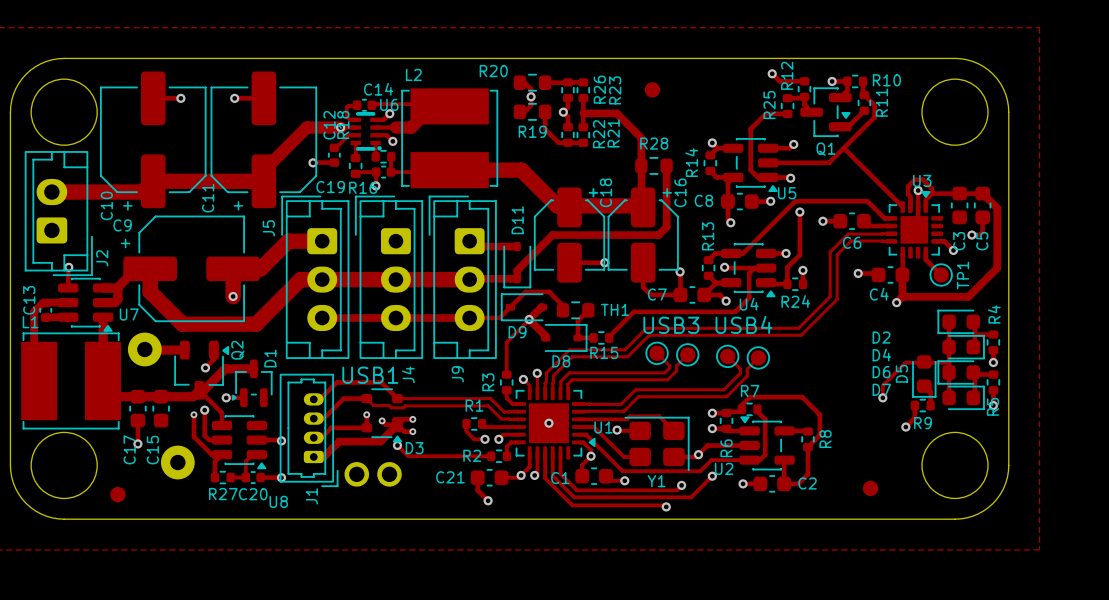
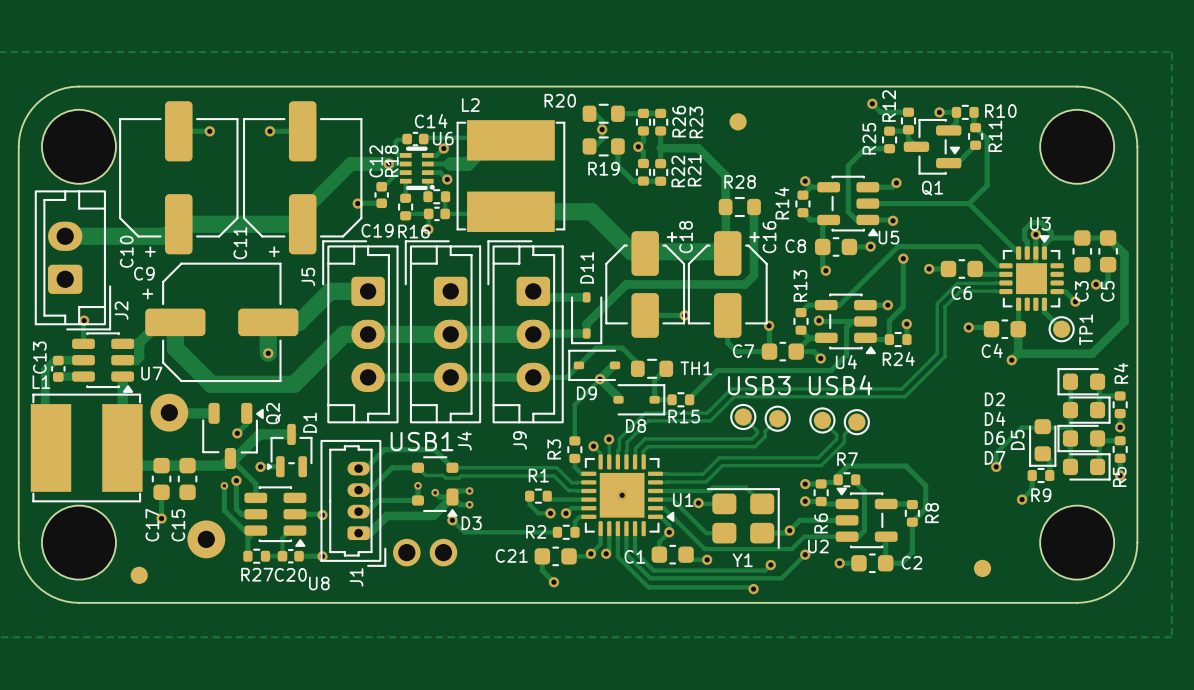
track: (874, 117) (829, 162) -> (987, 152) (987, 185) (969, 203) (936, 203)
track: (843, 148) (858, 162) -> none

